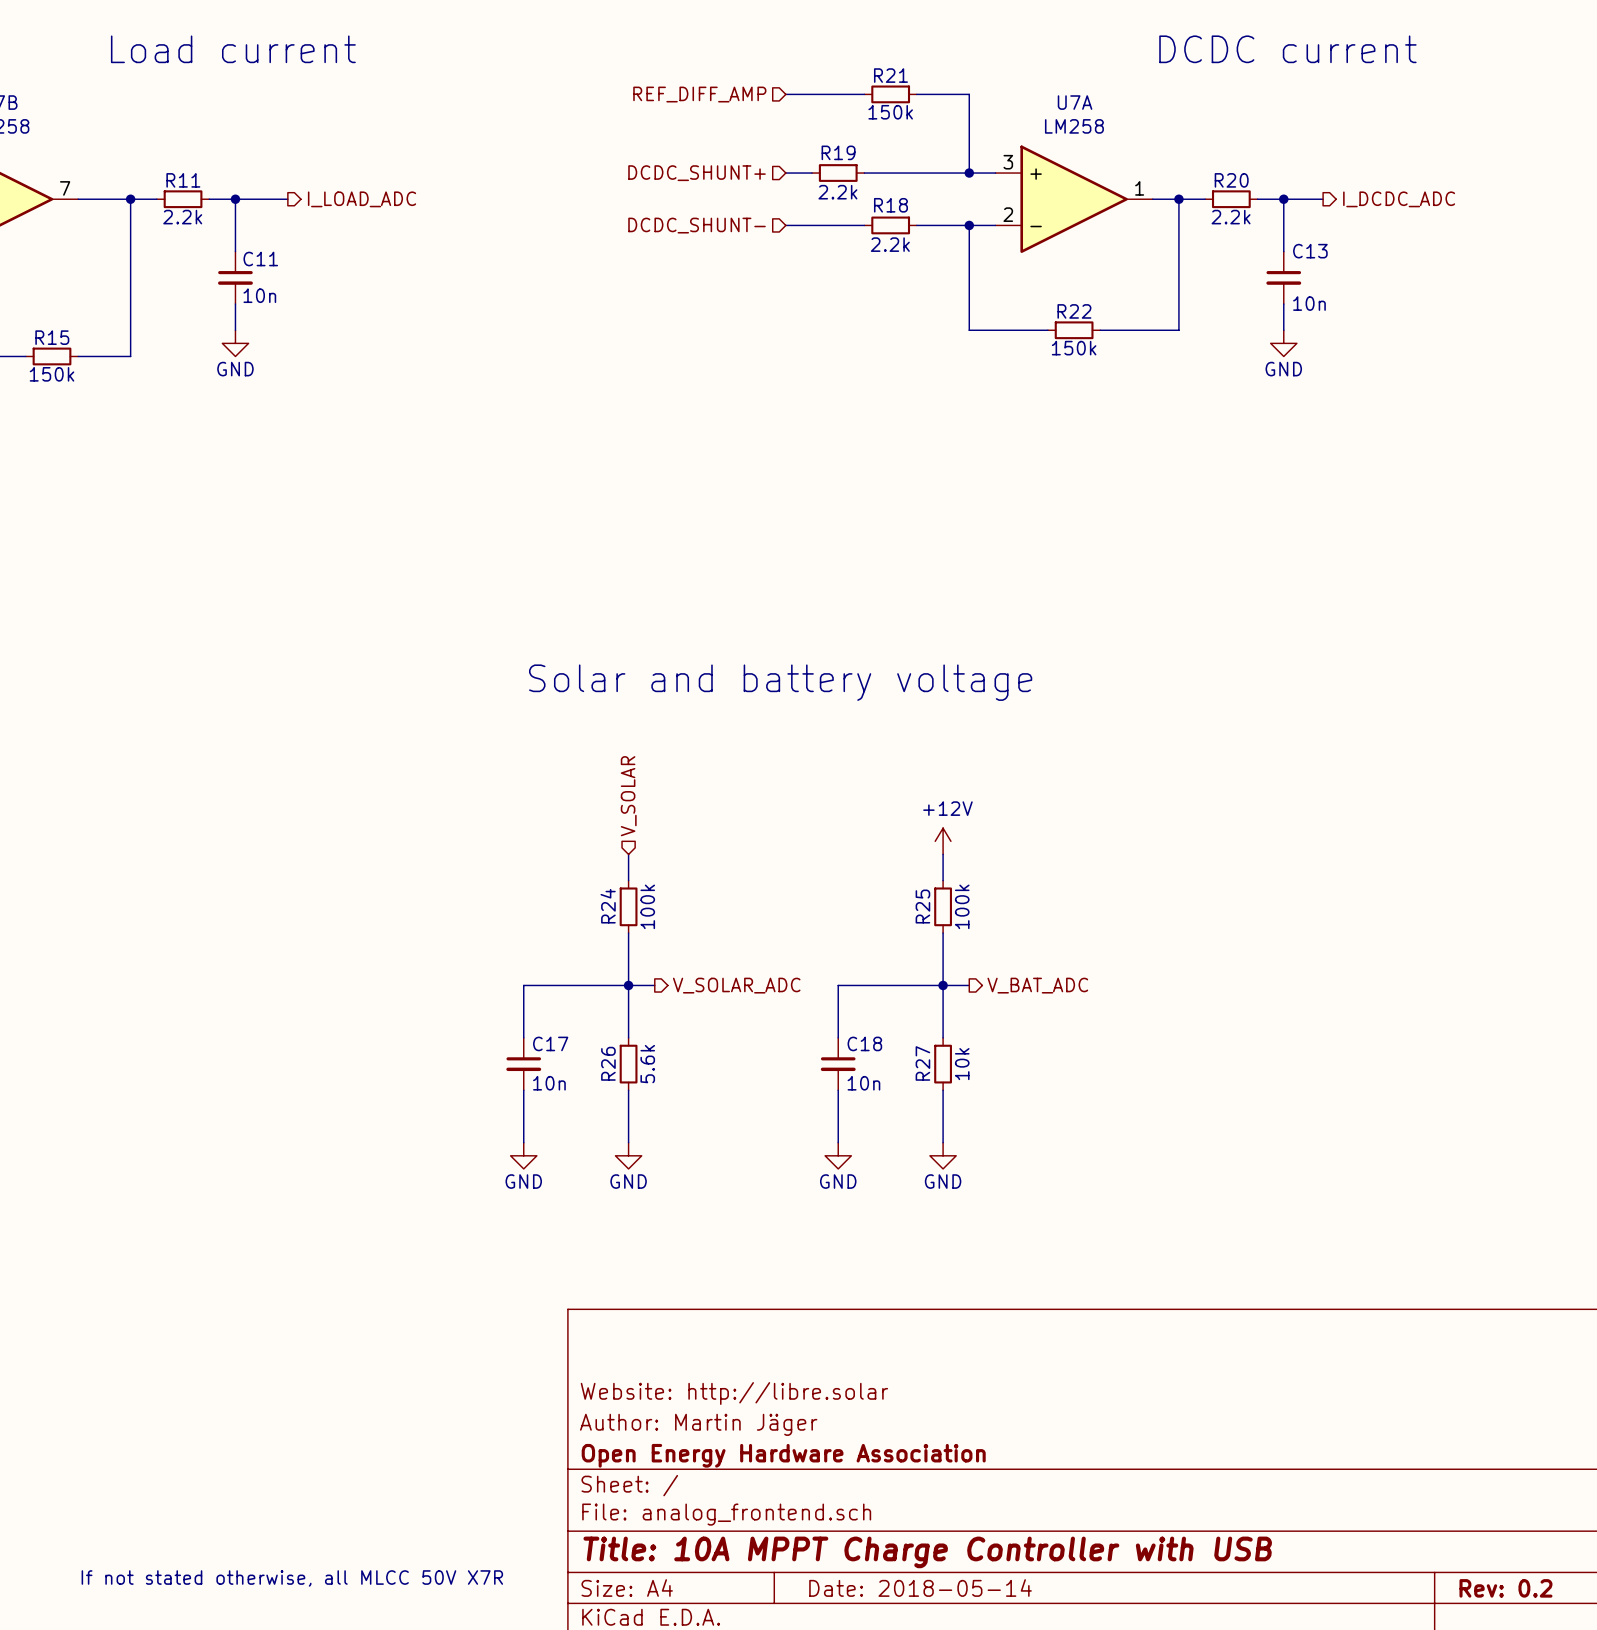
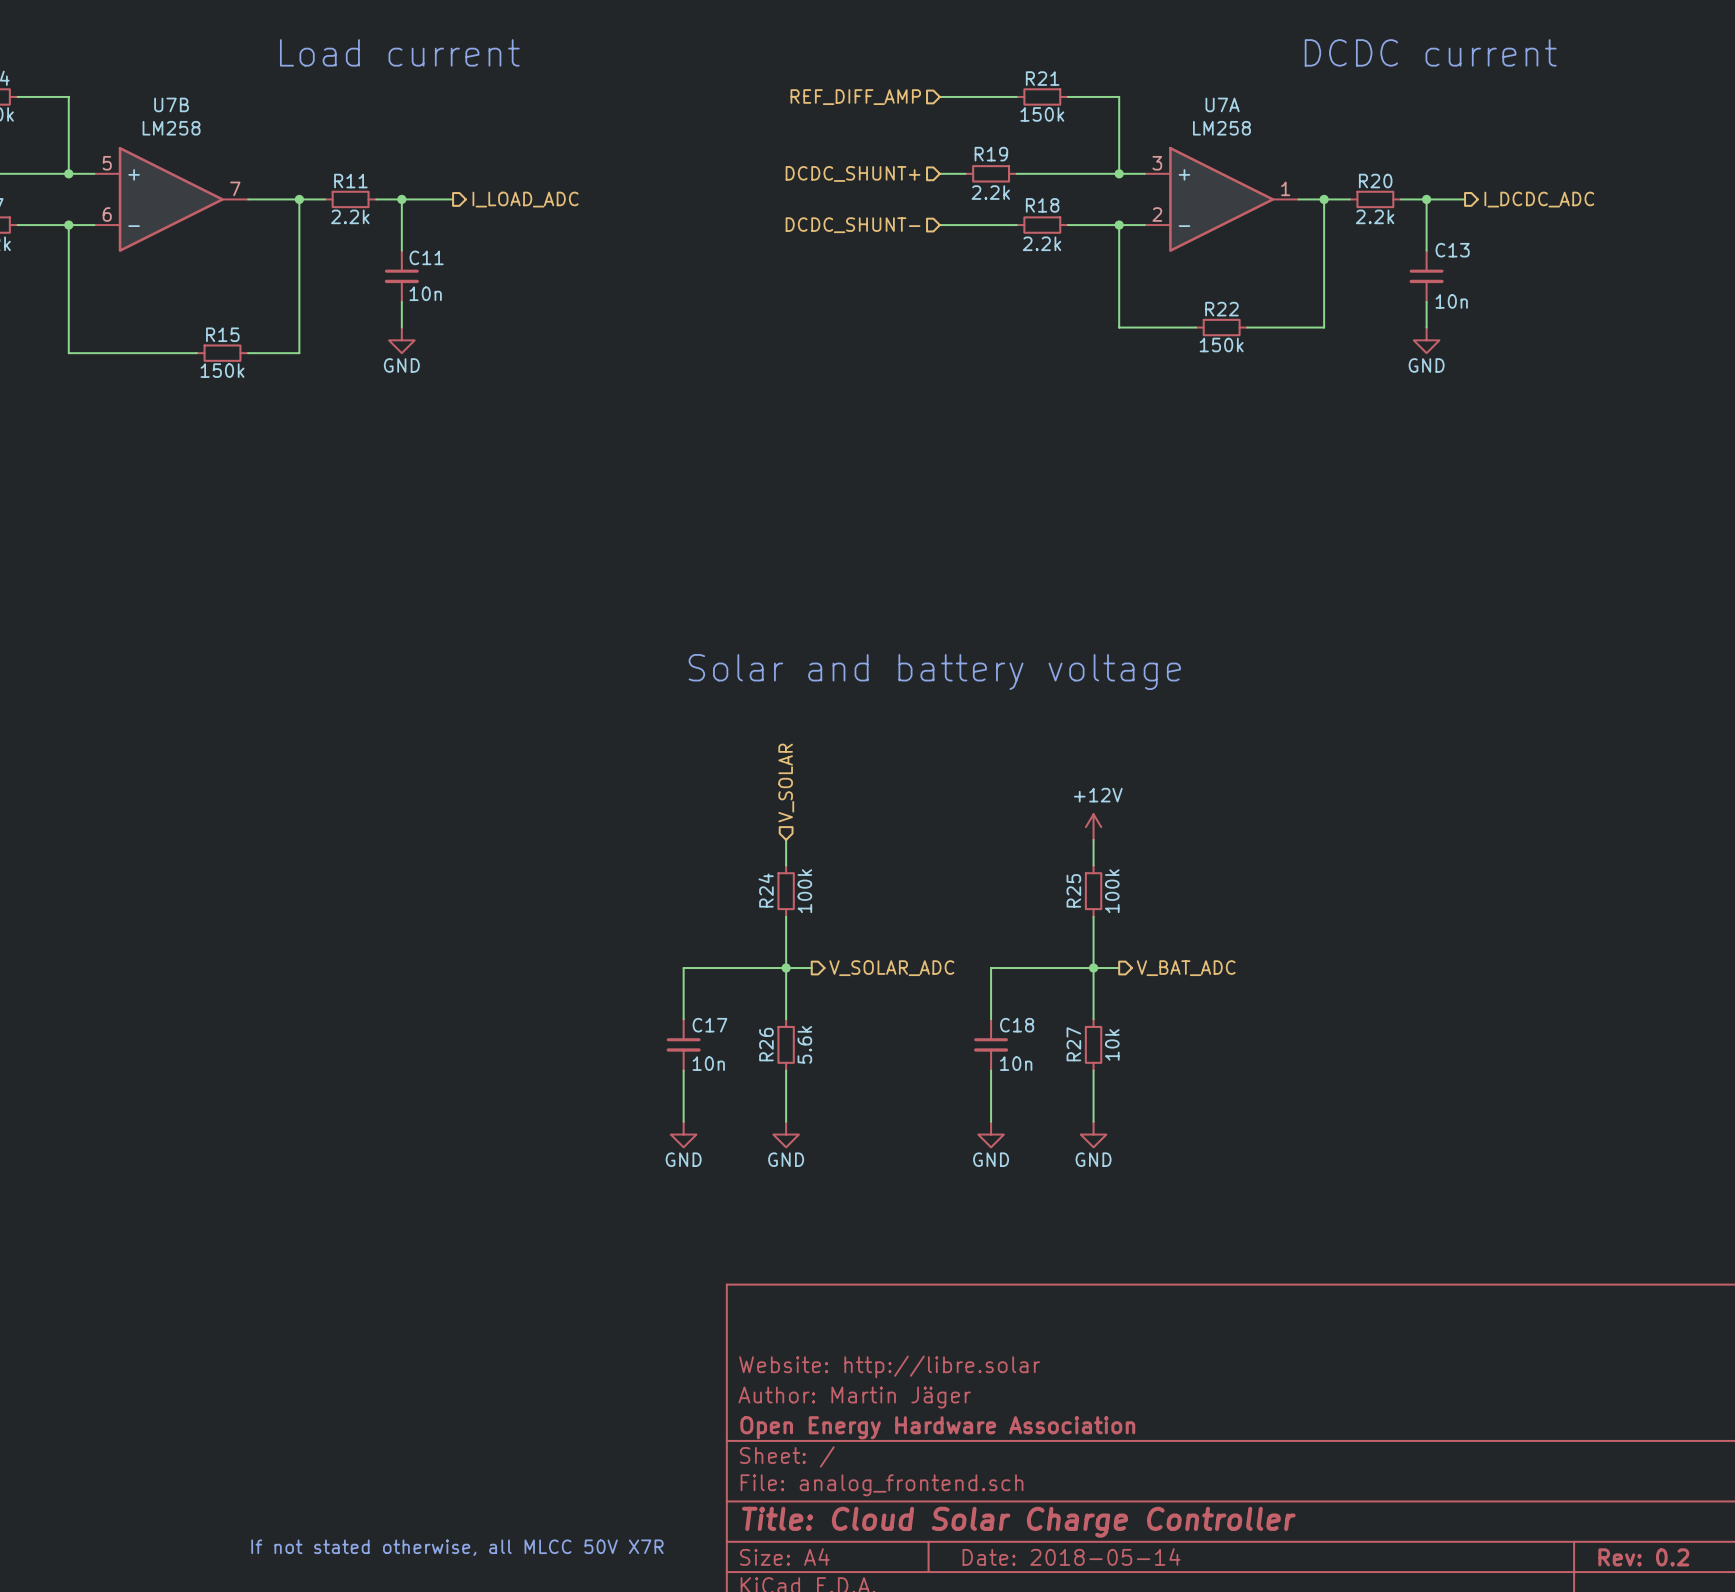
title block: Title: 10A MPPT Charge Controller with USB (927, 1552) -> Title: Cloud Solar Charge Controller (1018, 1522)

